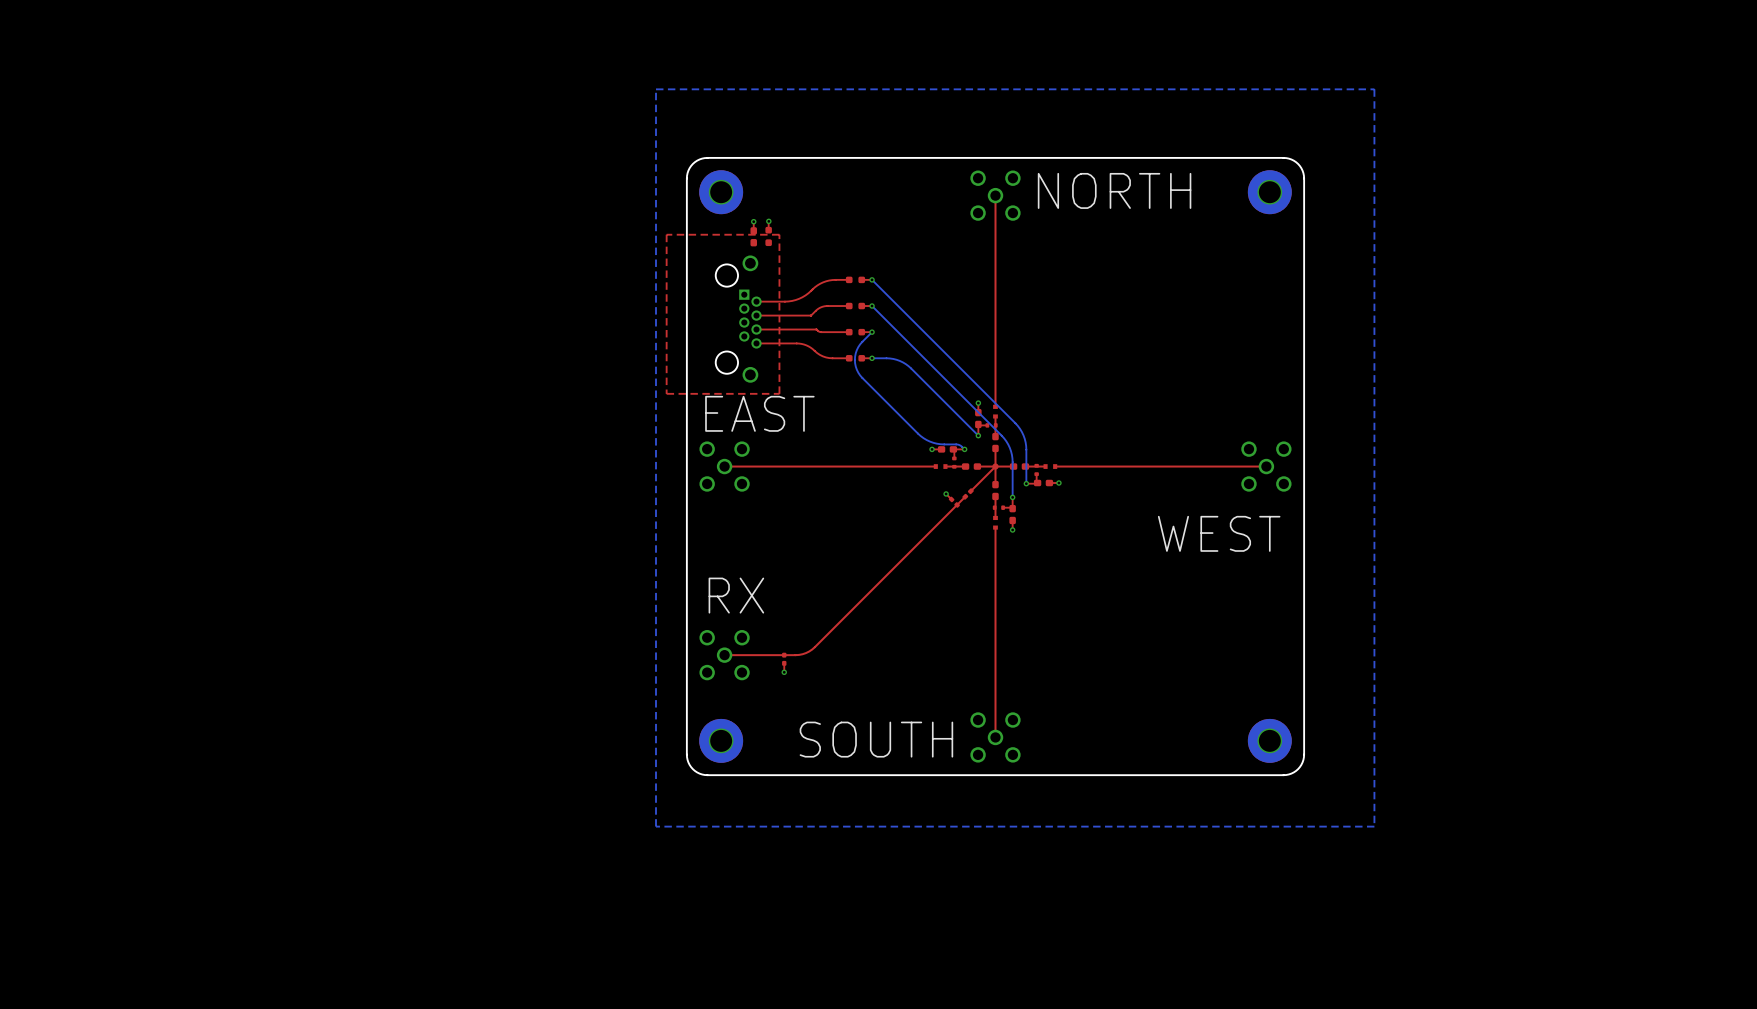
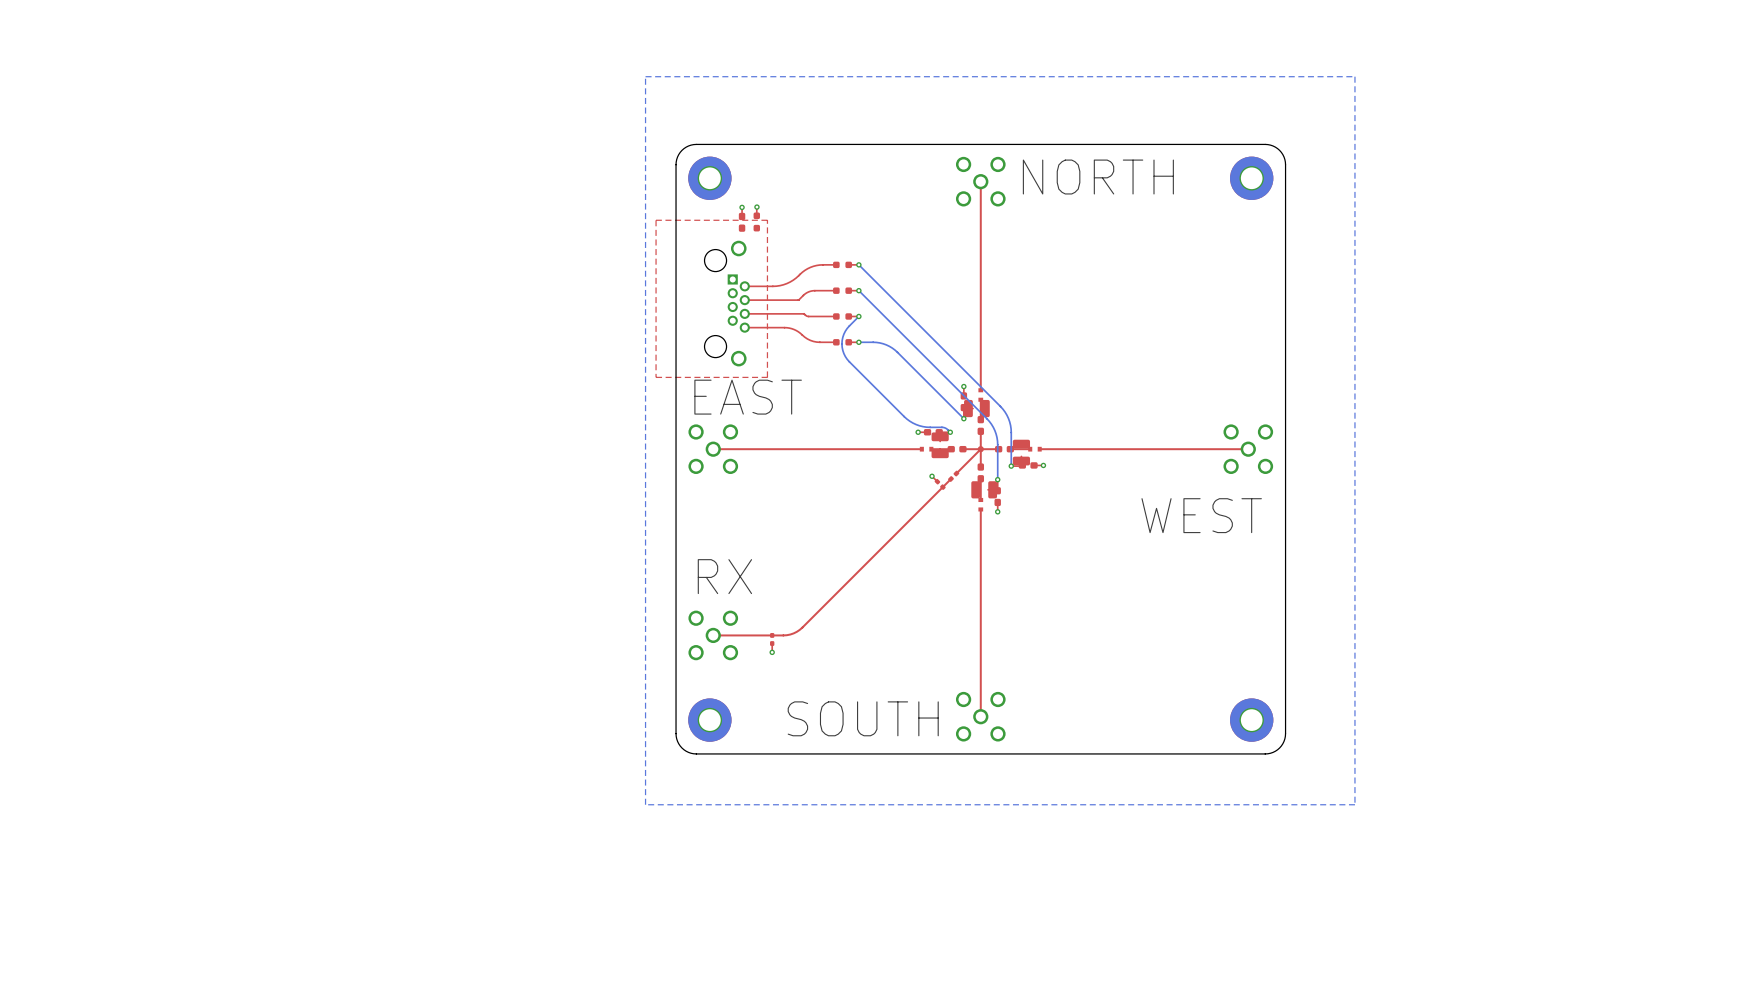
part footprint: [985, 423, 998, 428] -> [964, 399, 990, 418]
part footprint: [952, 456, 957, 469] -> [931, 432, 949, 459]
part footprint: [1034, 463, 1039, 477] -> [1012, 439, 1031, 466]
part footprint: [992, 505, 1006, 510] -> [971, 481, 998, 499]

